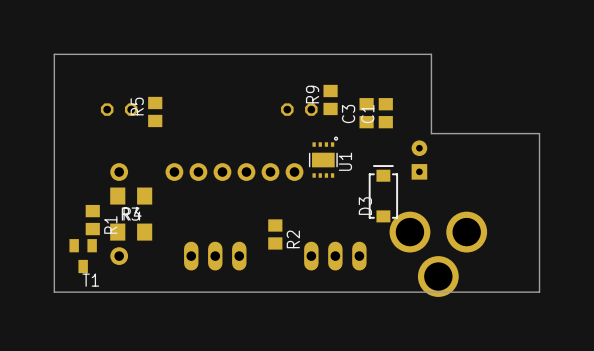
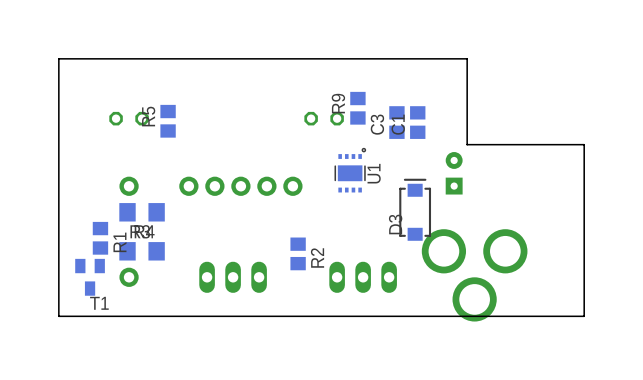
part: (294, 172) -> none

